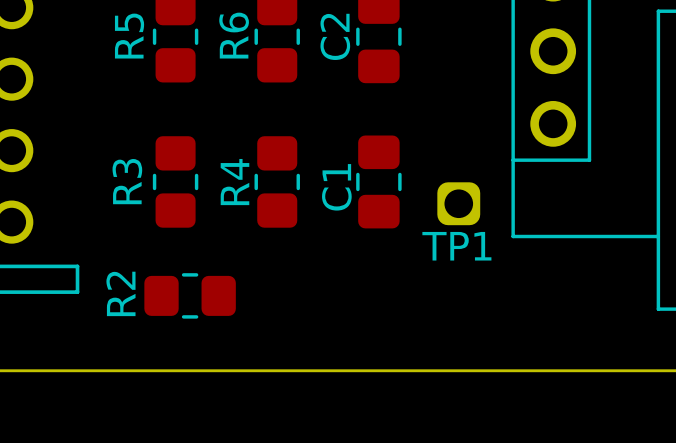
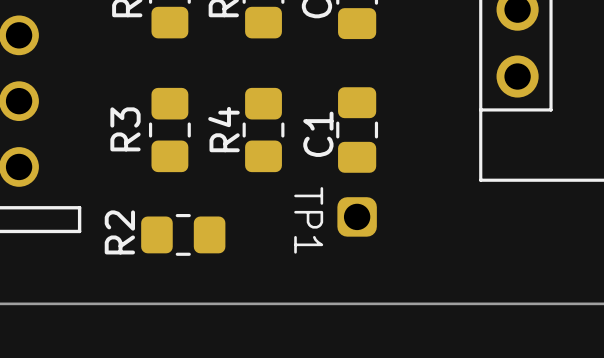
TP1 position: (458, 203) -> (357, 216)
TP1 name rotation: 0° (456, 246) -> 90° clockwise (308, 220)

